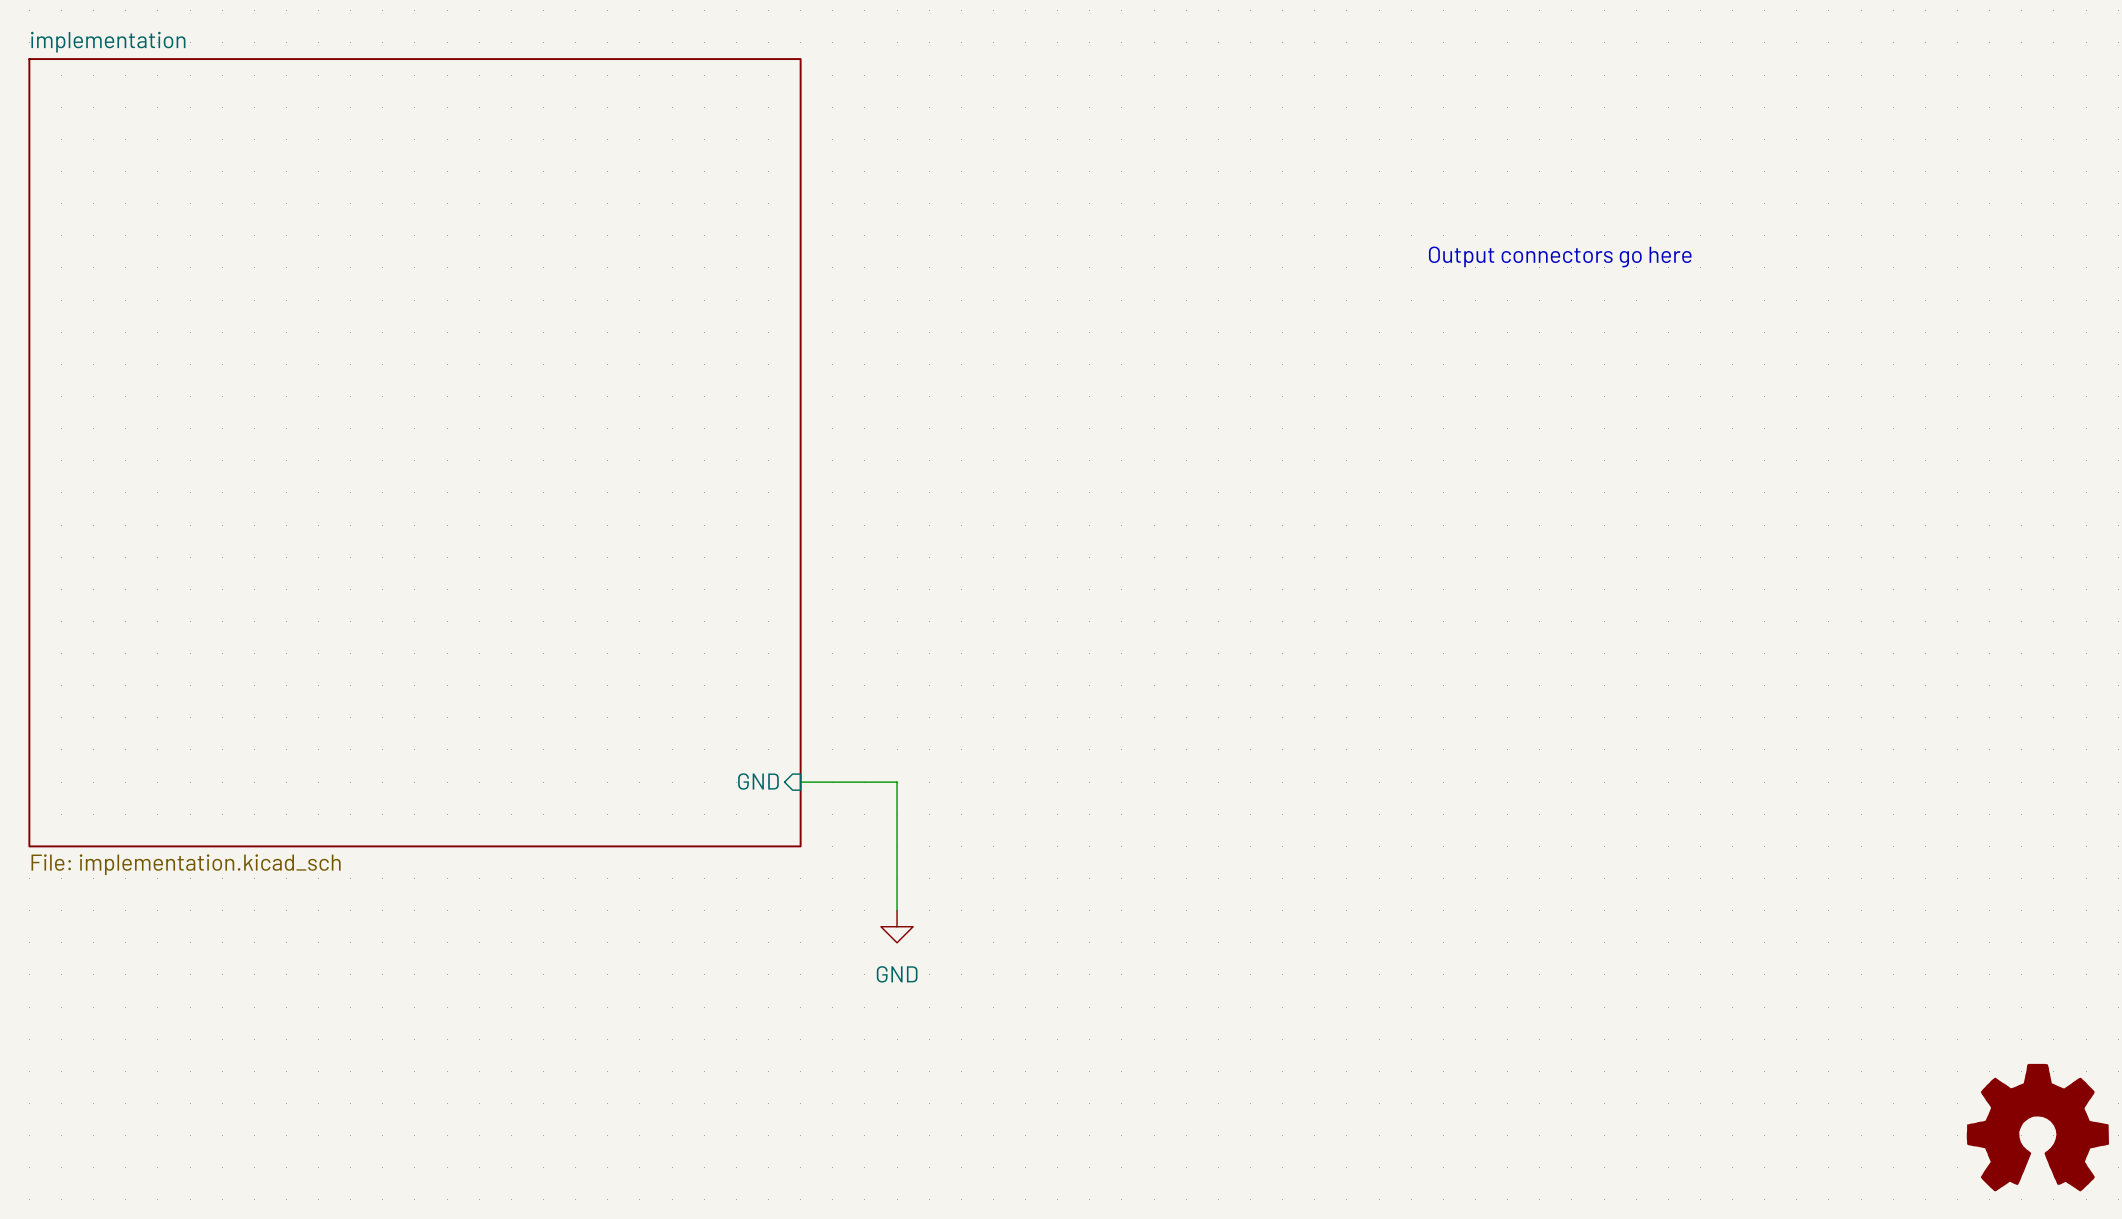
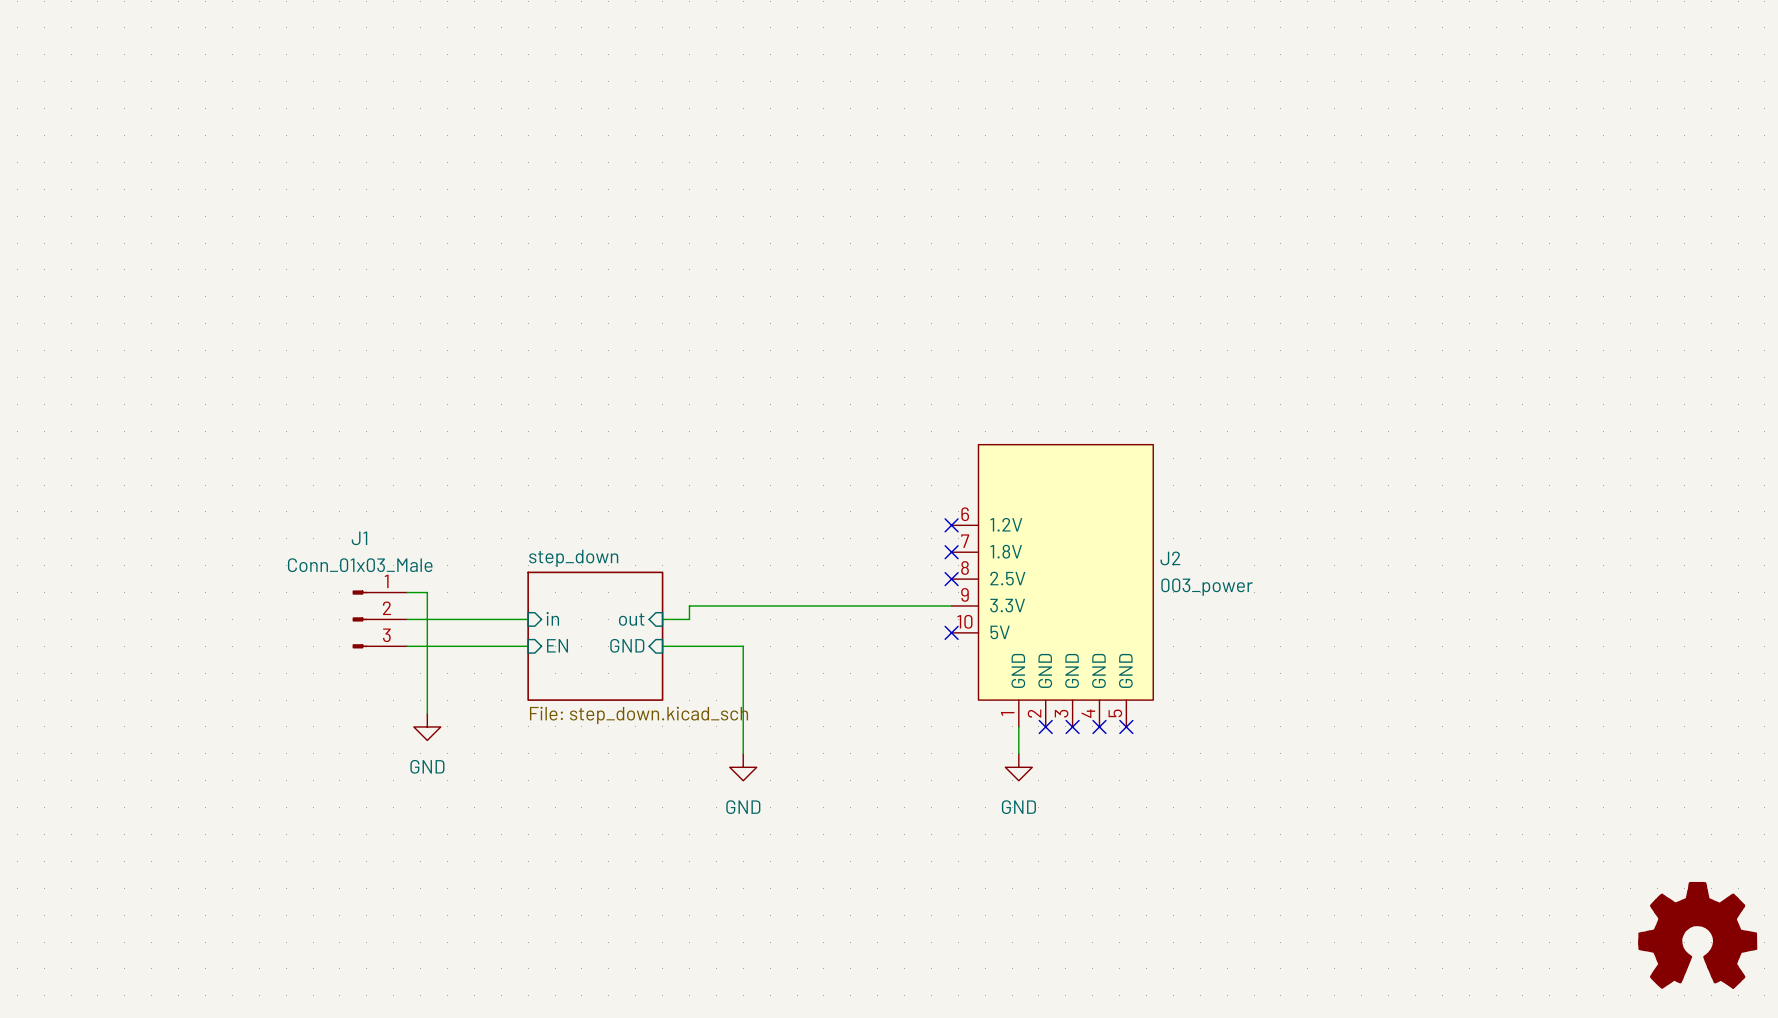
text: Output connectors go here (1560, 256) -> none
sheet implementation: File: implementation.kicad_sch (414, 452) -> none
no-connect mark: none -> (951, 525)
no-connect mark: none -> (951, 552)
no-connect mark: none -> (951, 579)
J2: none -> 003_power (1052, 585)
wire: none -> (407, 592) (427, 592) (427, 713)
wire: none -> (951, 605) (689, 605) (689, 619) (662, 619)
J1: none -> Conn_01x03_Male (379, 619)
wire: none -> (407, 619) (528, 619)
sheet pin: none -> in (552, 618)
sheet pin: none -> out (631, 619)
no-connect mark: none -> (951, 632)
sheet step_down: none -> File: step_down.kicad_sch (595, 636)
sheet pin: none -> EN (557, 645)
wire: none -> (407, 646) (528, 646)
power symbol: none -> GND (427, 726)
wire: none -> (1018, 726) (1018, 753)
no-connect mark: none -> (1045, 726)
no-connect mark: none -> (1072, 726)
no-connect mark: none -> (1099, 726)
no-connect mark: none -> (1126, 726)
power symbol: none -> GND (1018, 767)

